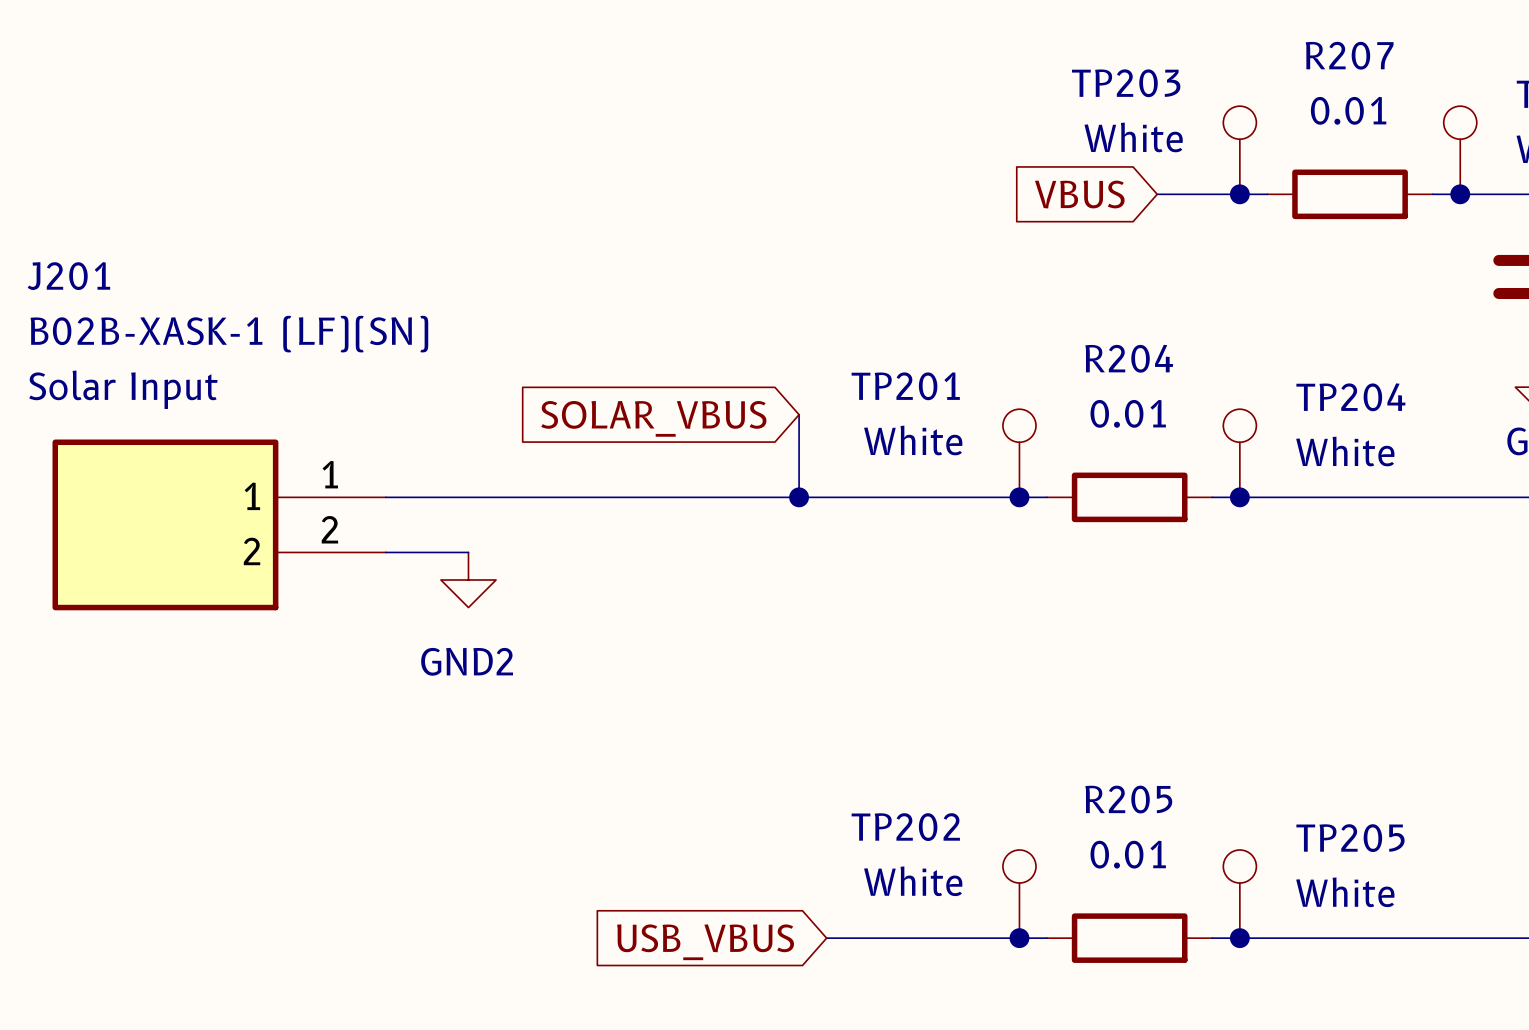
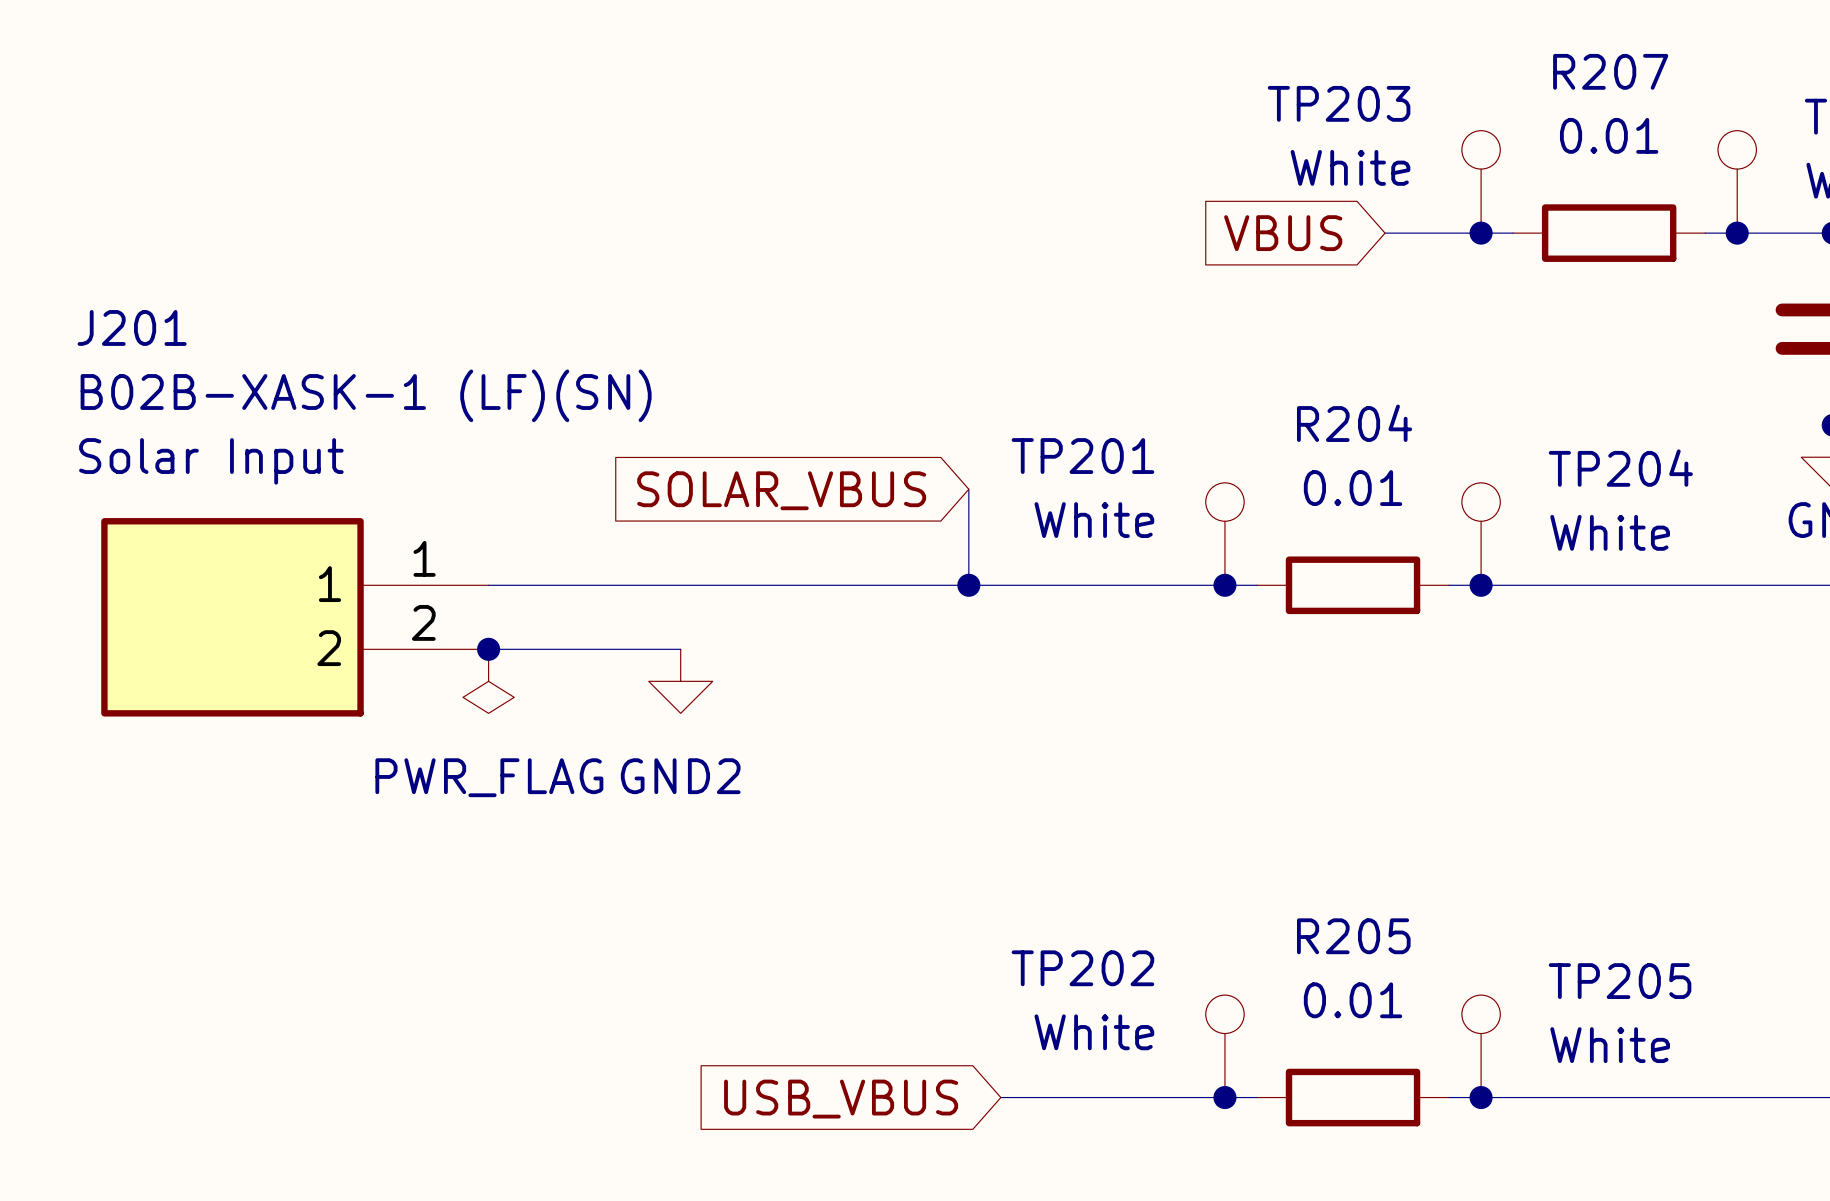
junction: none -> (488, 649)
wire: none -> (584, 649) (680, 649)
power symbol: none -> PWR_FLAG (488, 681)
power symbol position: GND2 (468, 580) -> GND2 (680, 681)

